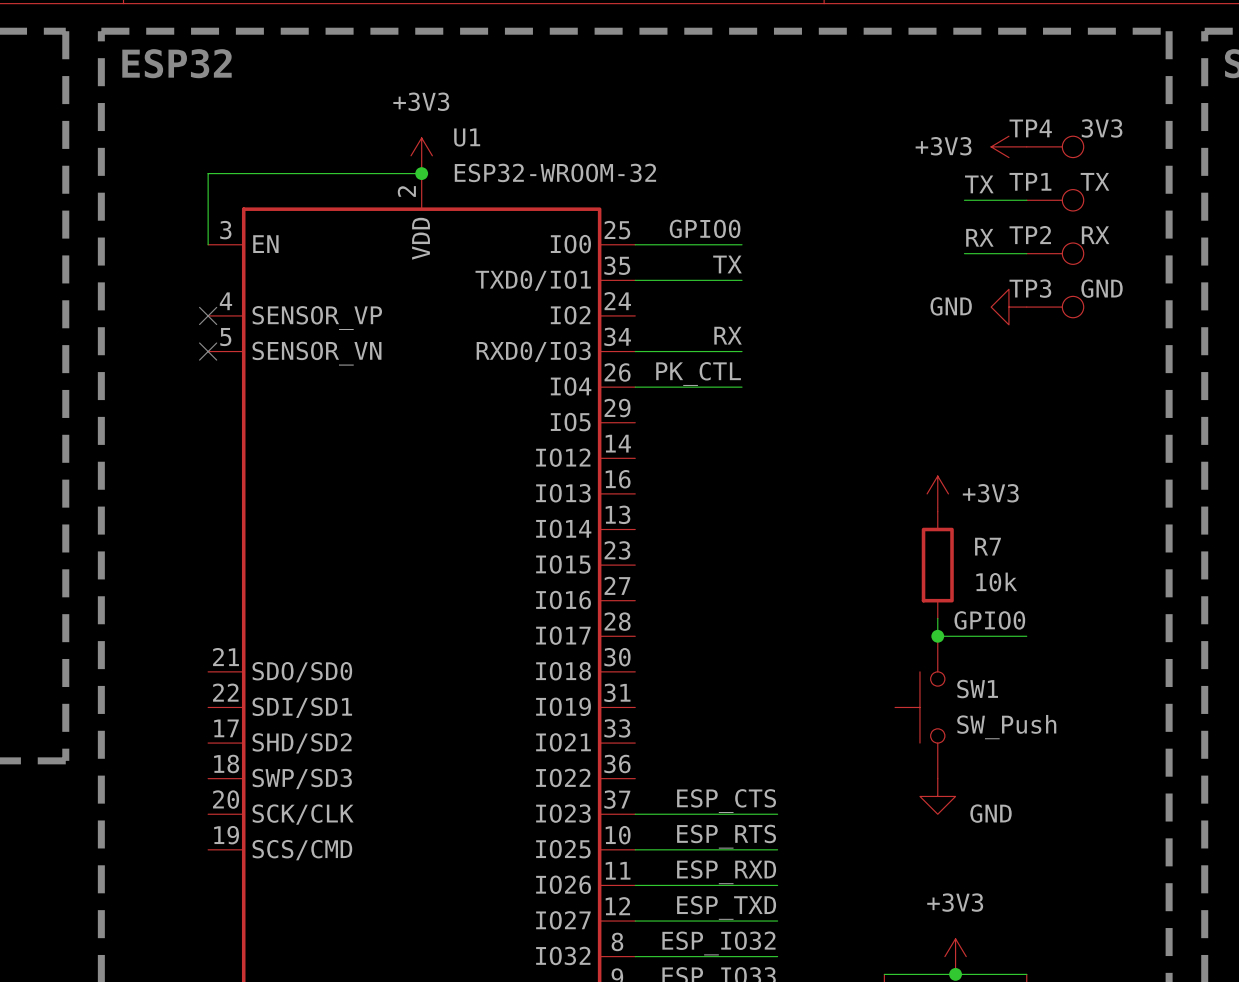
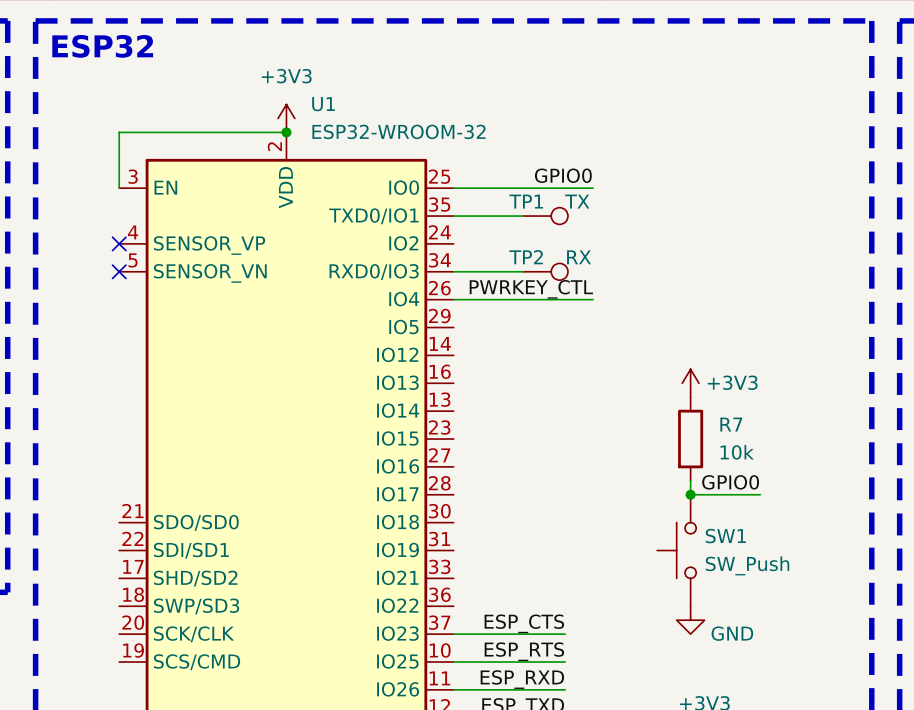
power symbol: +3V3 (1008, 146) -> none
TP4: 3V3 (1055, 146) -> none
label: TX (979, 184) -> none
wire: (964, 200) (1026, 200) -> none
TP1 position: (1055, 200) -> (545, 216)
label position: GPIO0 (705, 228) -> GPIO0 (563, 175)
label: RX (979, 237) -> none
wire: none -> (537, 188) (593, 188)
wire: (964, 253) (1026, 253) -> none
TP2 position: (1055, 253) -> (545, 271)
label: TX (727, 264) -> none
power symbol: GND (1008, 307) -> none
TP3: GND (1055, 307) -> none
label: RX (728, 335) -> none
label: PK_CTL (698, 373) -> PWRKEY_CTL (531, 289)
wire: none -> (537, 299) (593, 299)

